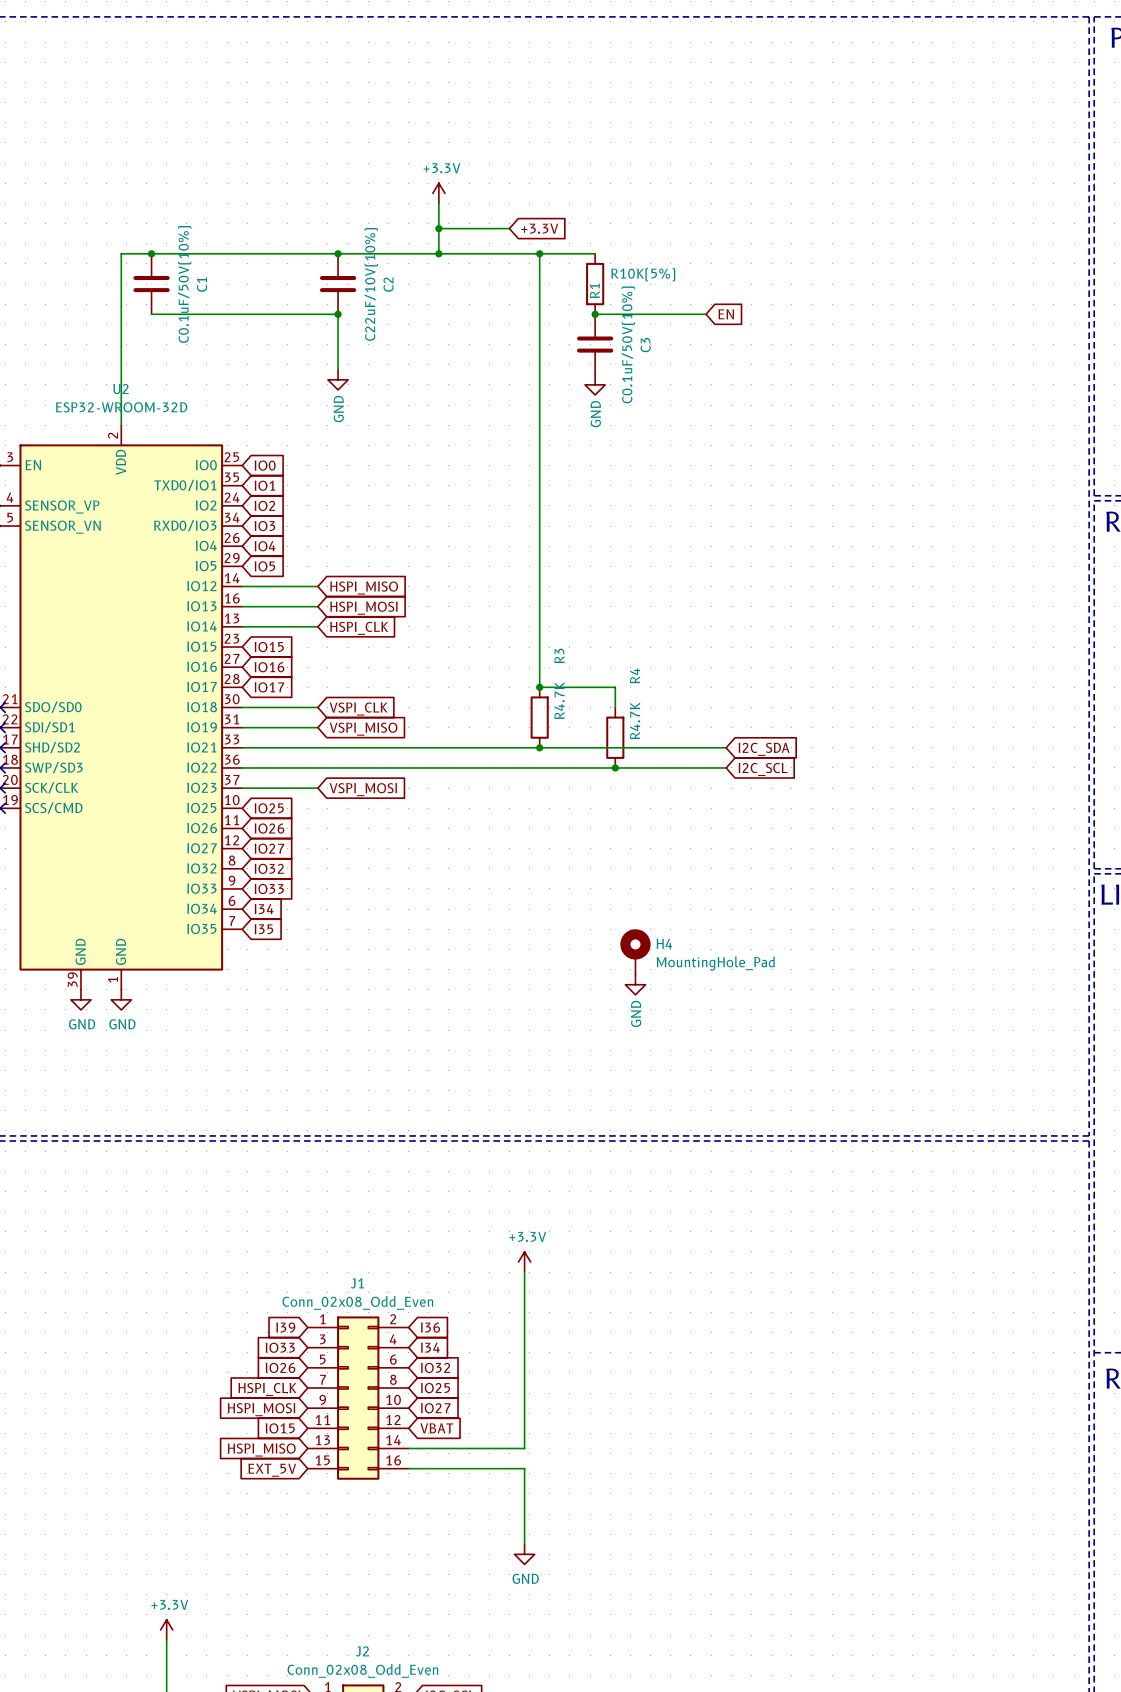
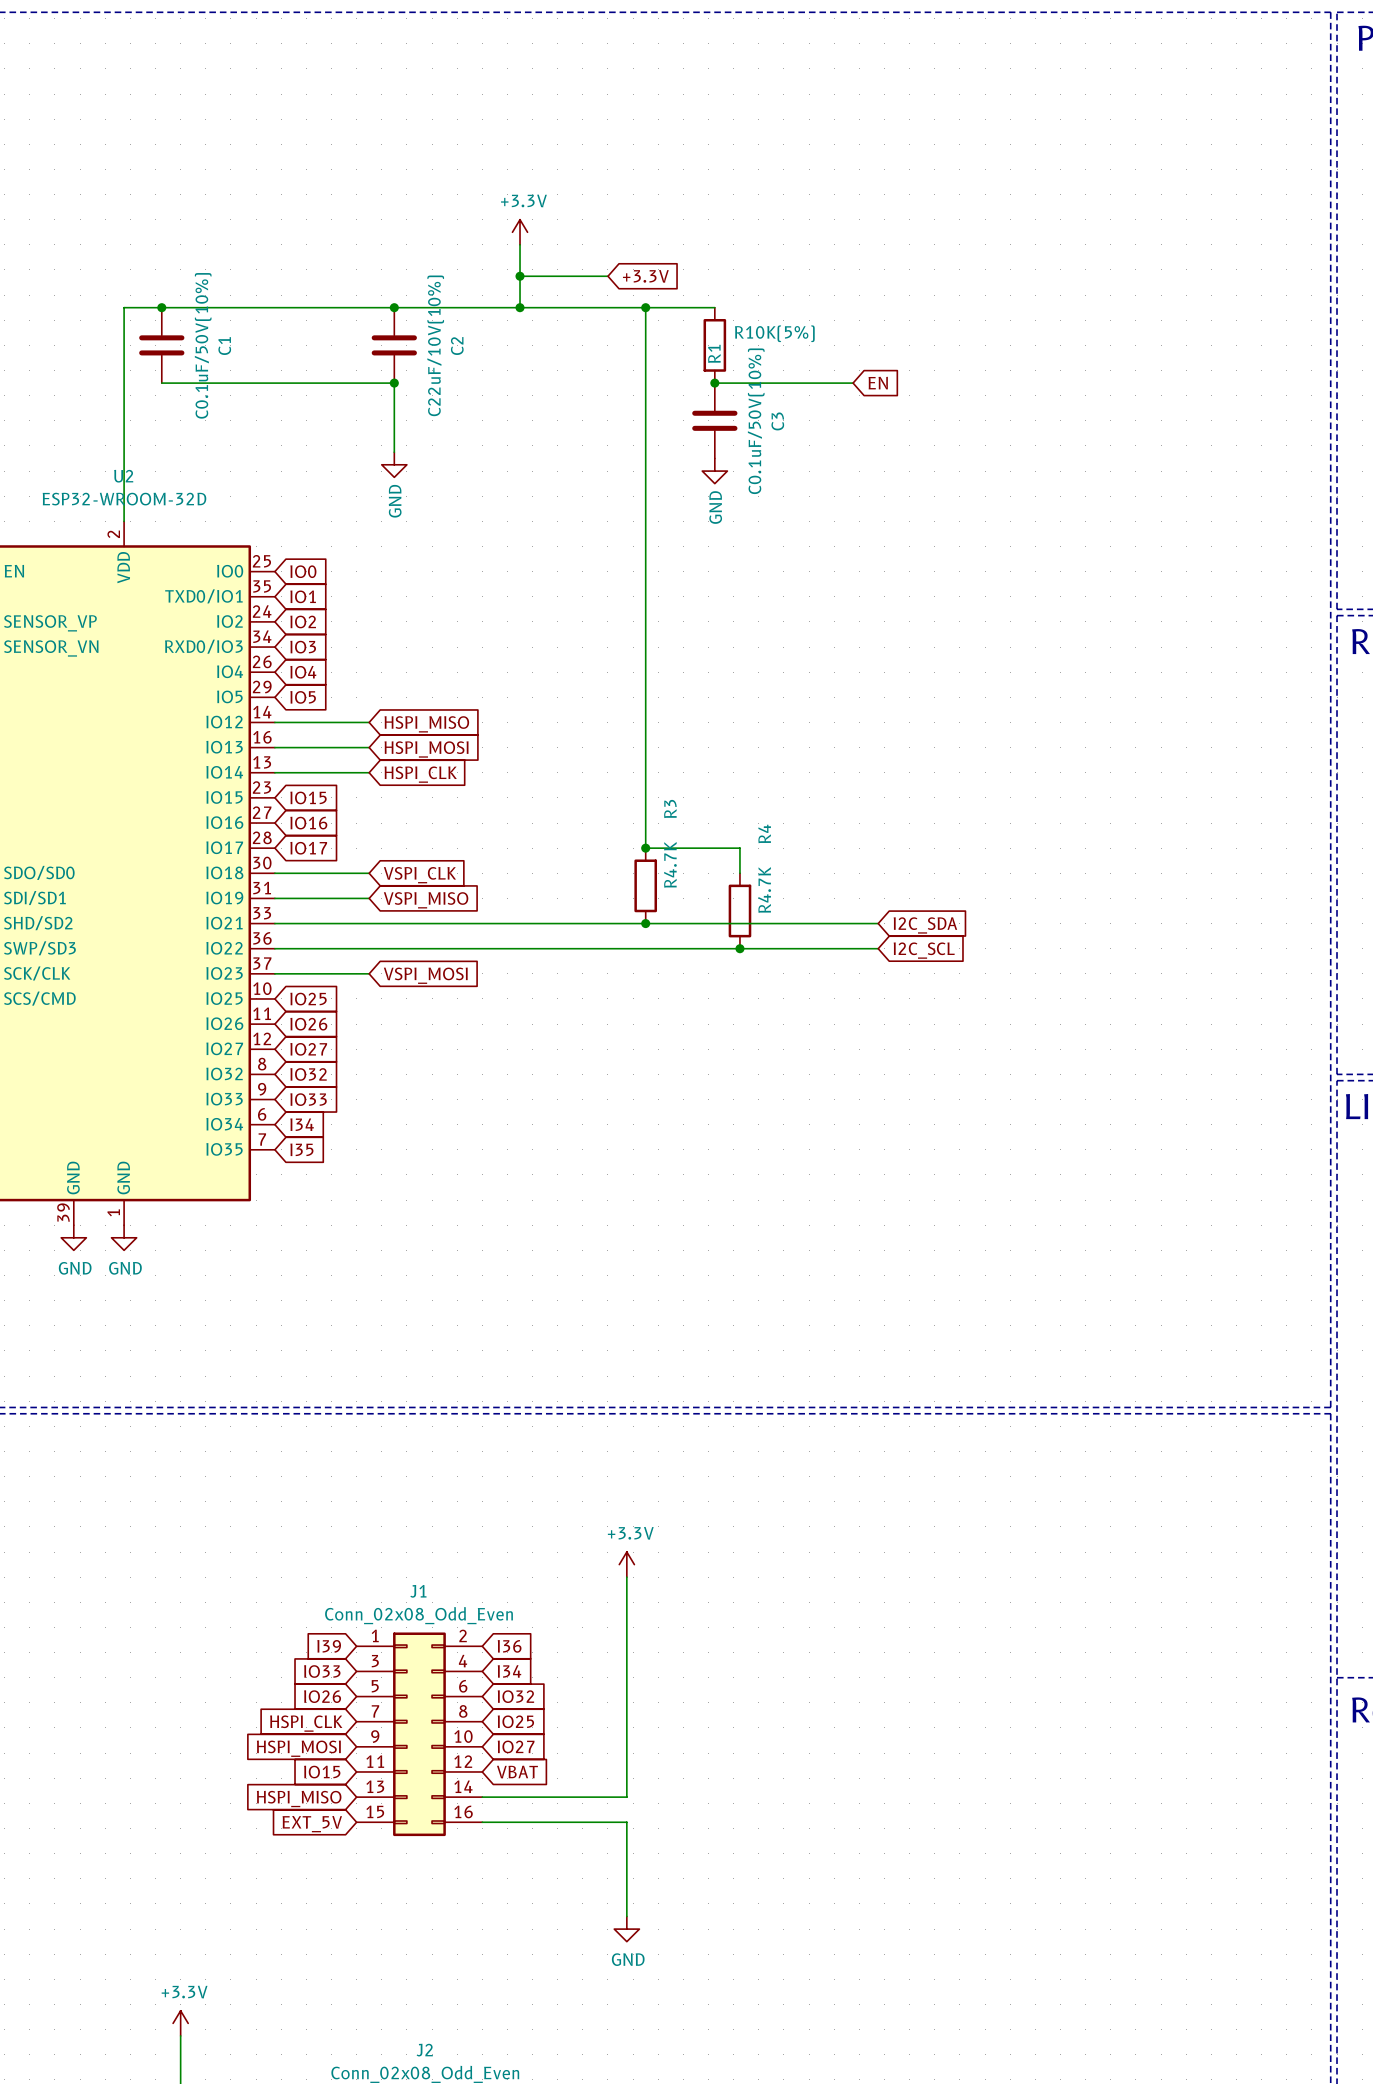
H4: MountingHole_Pad (635, 951) -> none
power symbol: GND (635, 984) -> none

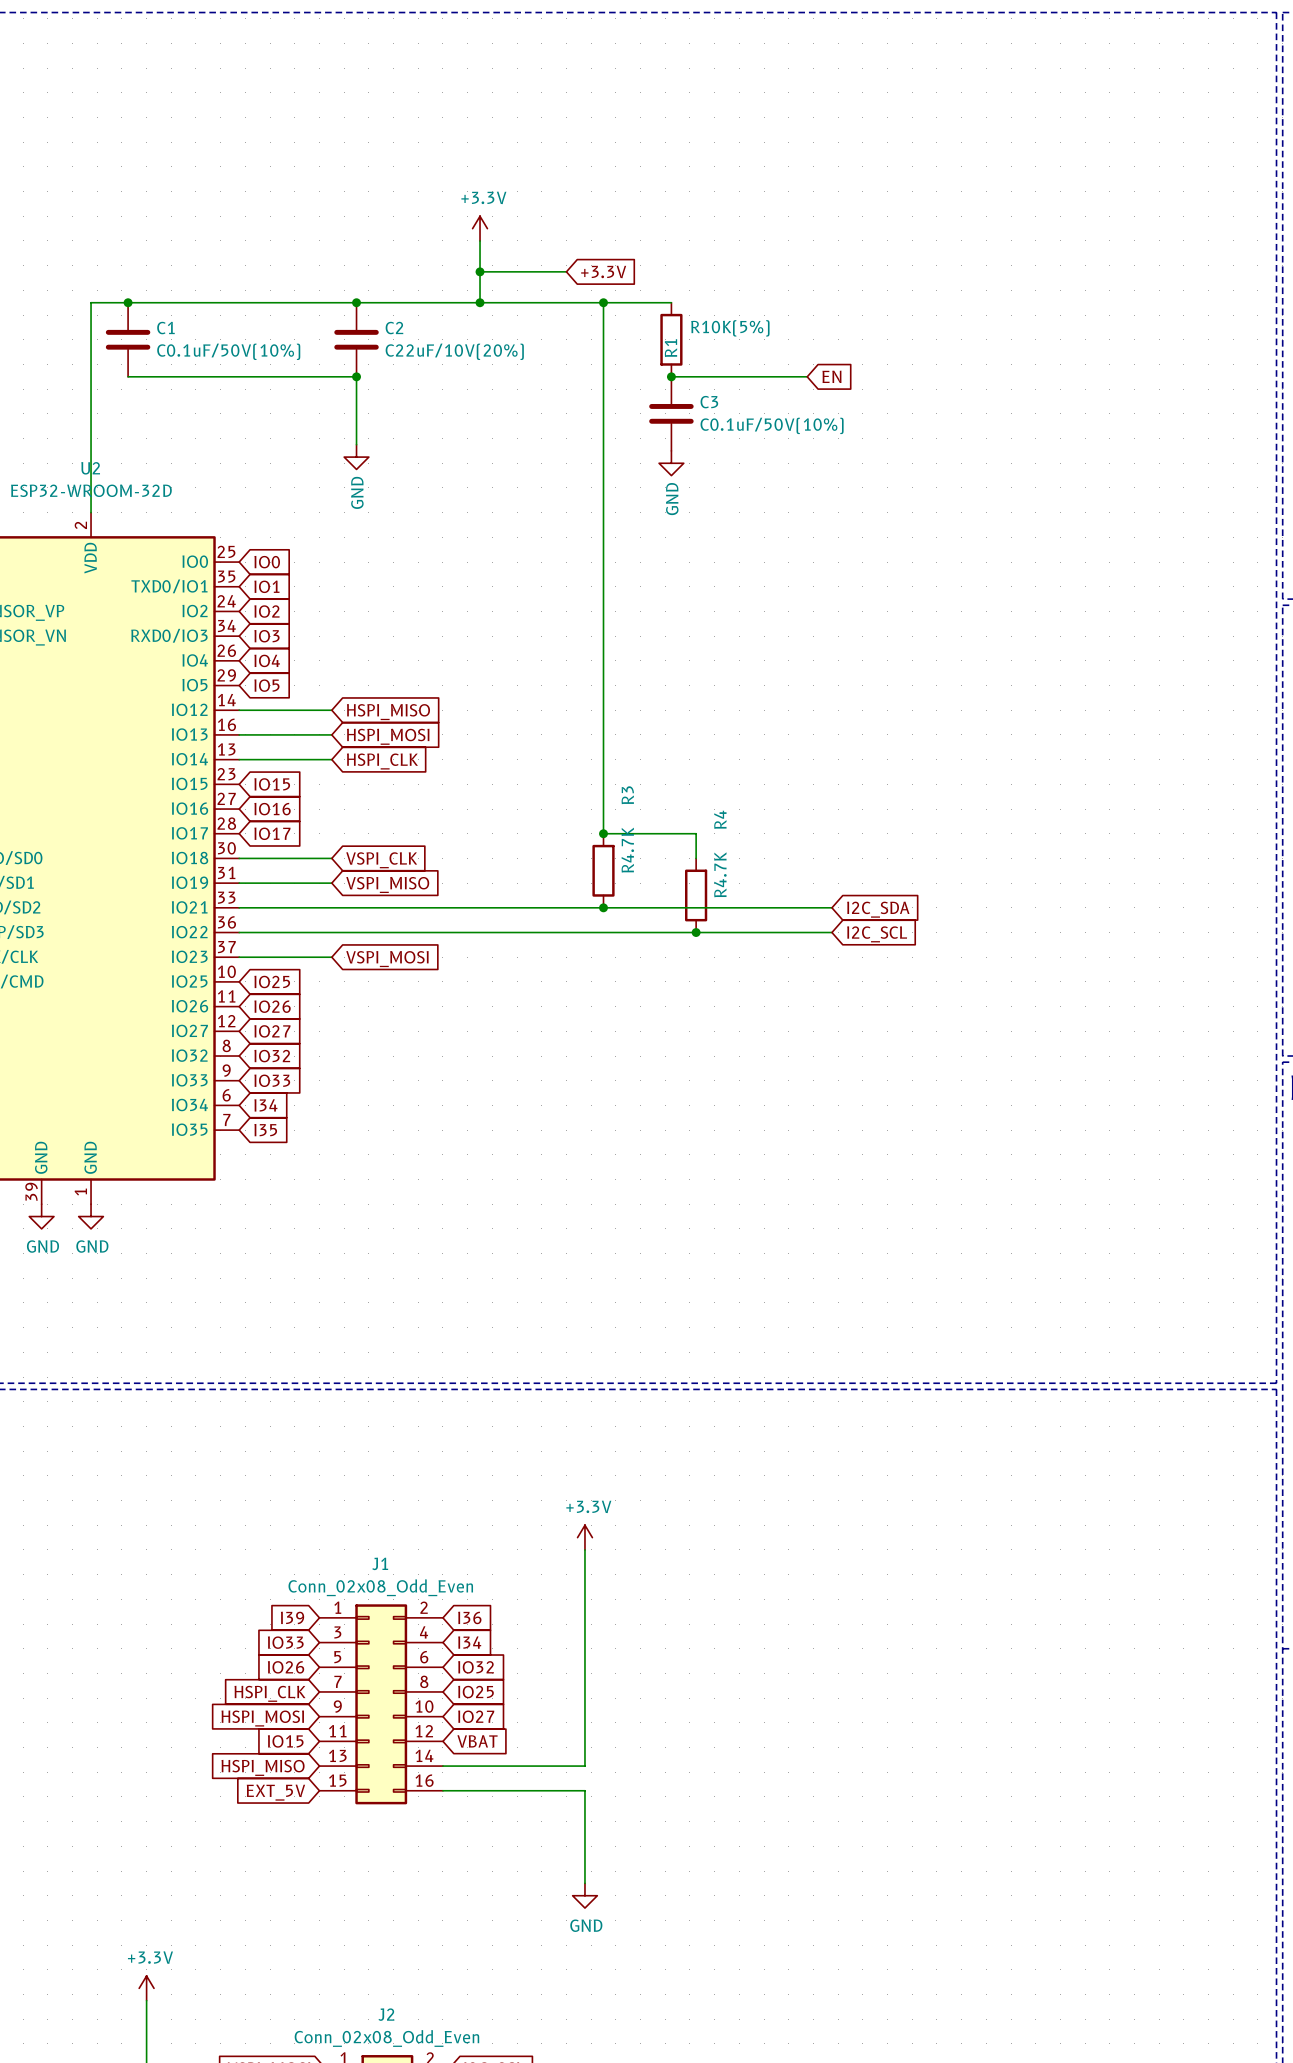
C1 value rotation: 0° (203, 345) -> 90° clockwise (228, 351)
C2 value: C22uF/10V(10%) (435, 345) -> C22uF/10V(20%) (454, 351)
C1 name rotation: 0° (224, 346) -> 90° clockwise (165, 328)
C2 name rotation: 0° (457, 346) -> 90° clockwise (394, 328)
C3 value rotation: 0° (756, 421) -> 90° clockwise (772, 425)
C3 name rotation: 0° (777, 421) -> 90° clockwise (709, 402)

